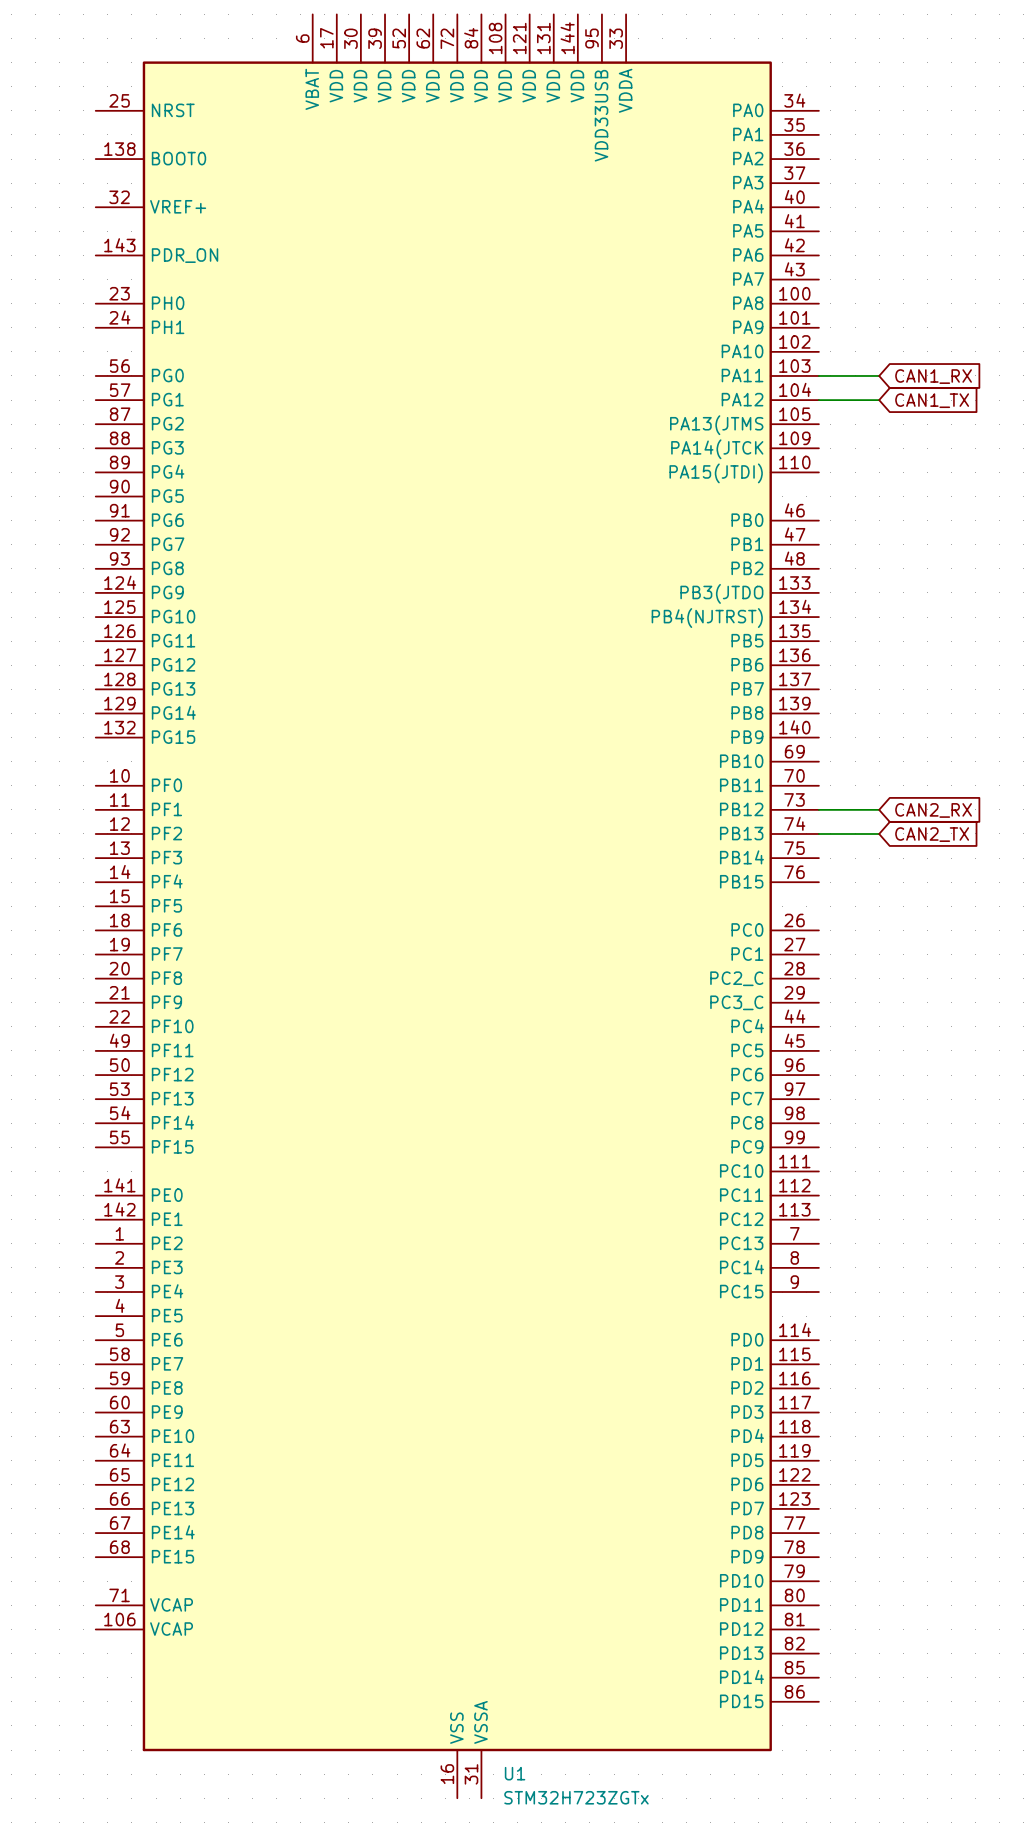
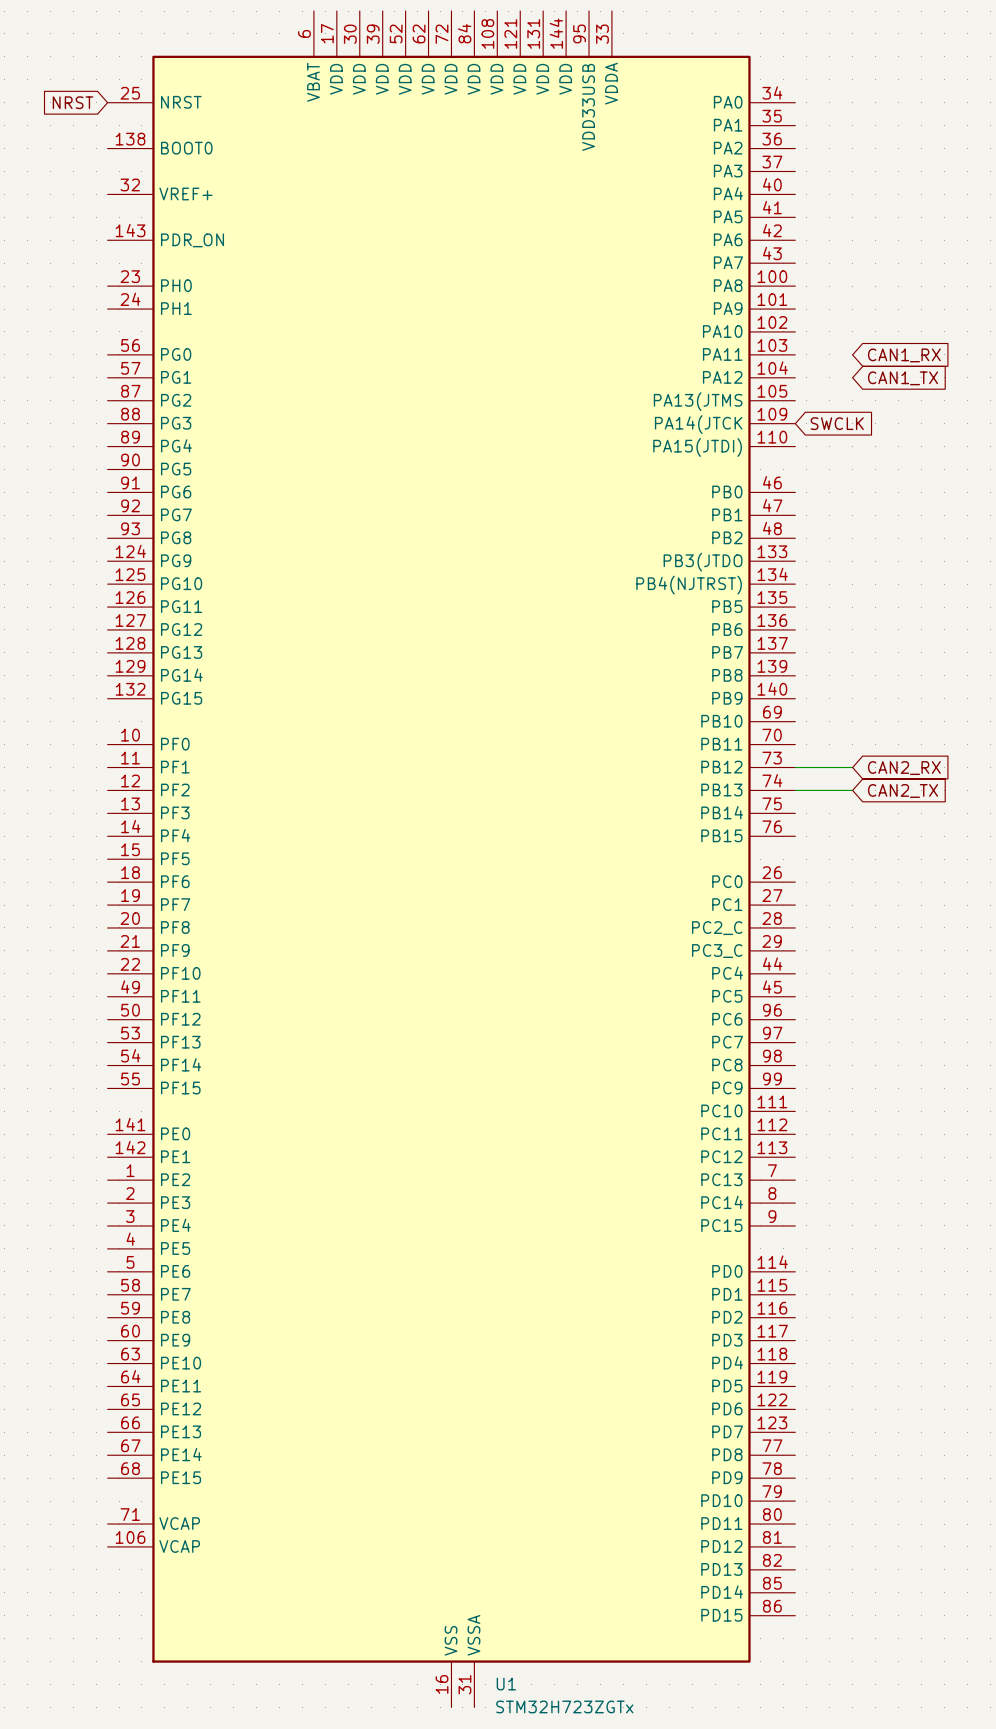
global label: none -> NRST (73, 102)
wire: (818, 375) (879, 375) -> none
wire: (818, 400) (879, 400) -> none
global label: none -> SWCLK (837, 423)

